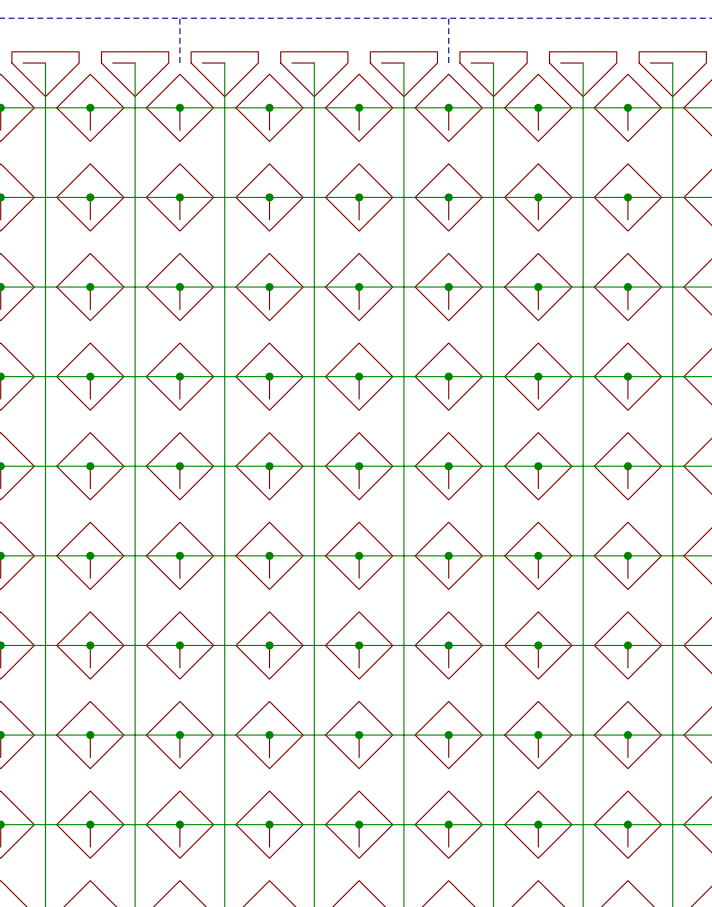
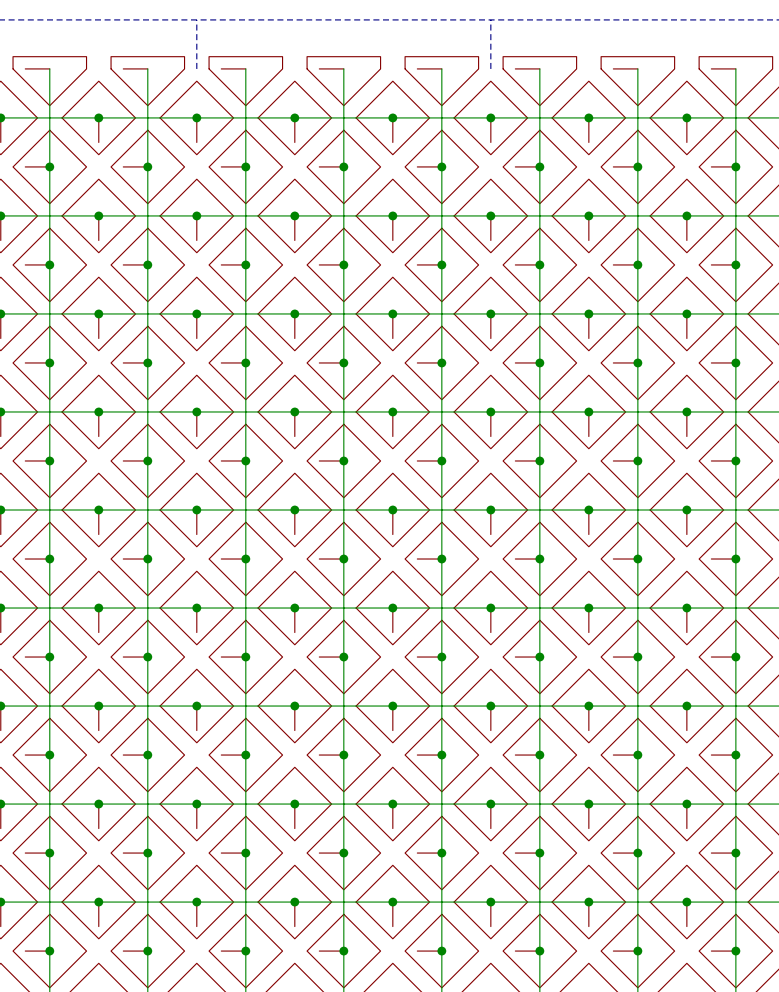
junction: none -> (49, 166)
part: none -> (49, 166)
junction: none -> (147, 166)
part: none -> (147, 166)
junction: none -> (245, 166)
part: none -> (245, 166)
junction: none -> (343, 166)
part: none -> (343, 166)
junction: none -> (441, 166)
part: none -> (441, 166)
junction: none -> (539, 166)
part: none -> (539, 166)
junction: none -> (637, 166)
part: none -> (637, 166)
junction: none -> (735, 166)
part: none -> (735, 166)
junction: none -> (49, 264)
part: none -> (49, 264)
junction: none -> (147, 264)
part: none -> (147, 264)
junction: none -> (245, 264)
part: none -> (245, 264)
junction: none -> (343, 264)
part: none -> (343, 264)
junction: none -> (441, 264)
part: none -> (441, 264)
junction: none -> (539, 264)
part: none -> (539, 264)
junction: none -> (637, 264)
part: none -> (637, 264)
junction: none -> (735, 264)
part: none -> (735, 264)
junction: none -> (49, 362)
part: none -> (49, 362)
junction: none -> (147, 362)
part: none -> (147, 362)
junction: none -> (245, 362)
part: none -> (245, 362)
junction: none -> (343, 362)
part: none -> (343, 362)
junction: none -> (441, 362)
part: none -> (441, 362)
junction: none -> (539, 362)
part: none -> (539, 362)
junction: none -> (637, 362)
part: none -> (637, 362)
junction: none -> (735, 362)
part: none -> (735, 362)
junction: none -> (49, 460)
part: none -> (49, 460)
junction: none -> (147, 460)
part: none -> (147, 460)
junction: none -> (245, 460)
part: none -> (245, 460)
junction: none -> (343, 460)
part: none -> (343, 460)
junction: none -> (441, 460)
part: none -> (441, 460)
junction: none -> (539, 460)
part: none -> (539, 460)
junction: none -> (637, 460)
part: none -> (637, 460)
junction: none -> (735, 460)
part: none -> (735, 460)
junction: none -> (49, 559)
part: none -> (49, 559)
junction: none -> (147, 559)
part: none -> (147, 559)
junction: none -> (245, 559)
part: none -> (245, 559)
junction: none -> (343, 559)
part: none -> (343, 559)
junction: none -> (441, 559)
part: none -> (441, 559)
junction: none -> (539, 559)
part: none -> (539, 559)
junction: none -> (637, 559)
part: none -> (637, 559)
junction: none -> (735, 559)
part: none -> (735, 559)
junction: none -> (49, 657)
part: none -> (49, 657)
junction: none -> (147, 657)
part: none -> (147, 657)
junction: none -> (245, 657)
part: none -> (245, 657)
junction: none -> (343, 657)
part: none -> (343, 657)
junction: none -> (441, 657)
part: none -> (441, 657)
junction: none -> (539, 657)
part: none -> (539, 657)
junction: none -> (637, 657)
part: none -> (637, 657)
junction: none -> (735, 657)
part: none -> (735, 657)
junction: none -> (49, 755)
part: none -> (49, 755)
junction: none -> (147, 755)
part: none -> (147, 755)
junction: none -> (245, 755)
part: none -> (245, 755)
junction: none -> (343, 755)
part: none -> (343, 755)
junction: none -> (441, 755)
part: none -> (441, 755)
junction: none -> (539, 755)
part: none -> (539, 755)
junction: none -> (637, 755)
part: none -> (637, 755)
junction: none -> (735, 755)
part: none -> (735, 755)
junction: none -> (49, 853)
part: none -> (49, 853)
junction: none -> (147, 853)
part: none -> (147, 853)
junction: none -> (245, 853)
part: none -> (245, 853)
junction: none -> (343, 853)
part: none -> (343, 853)
junction: none -> (441, 853)
part: none -> (441, 853)
junction: none -> (539, 853)
part: none -> (539, 853)
junction: none -> (637, 853)
part: none -> (637, 853)
junction: none -> (735, 853)
part: none -> (735, 853)
junction: none -> (49, 951)
part: none -> (49, 951)
junction: none -> (147, 951)
part: none -> (147, 951)
junction: none -> (245, 951)
part: none -> (245, 951)
junction: none -> (343, 951)
part: none -> (343, 951)
junction: none -> (441, 951)
part: none -> (441, 951)
junction: none -> (539, 951)
part: none -> (539, 951)
junction: none -> (637, 951)
part: none -> (637, 951)
junction: none -> (735, 951)
part: none -> (735, 951)

